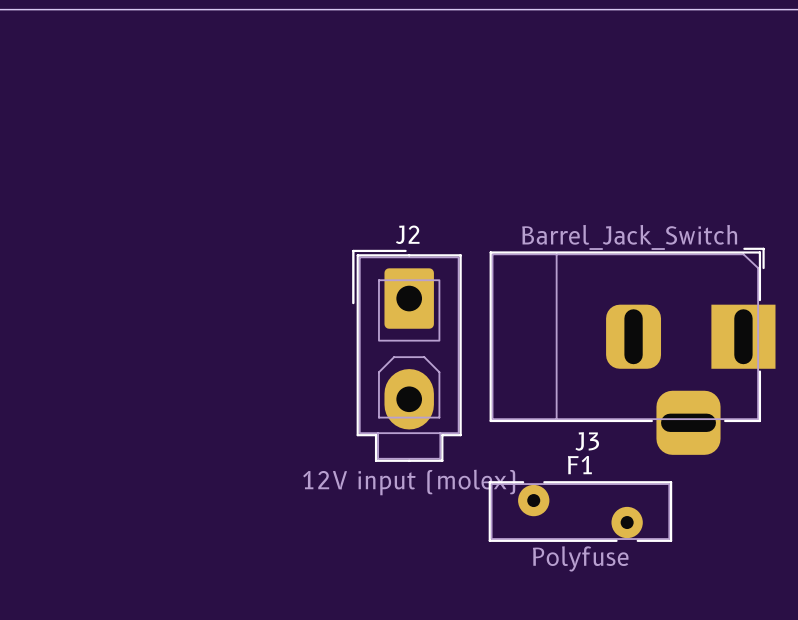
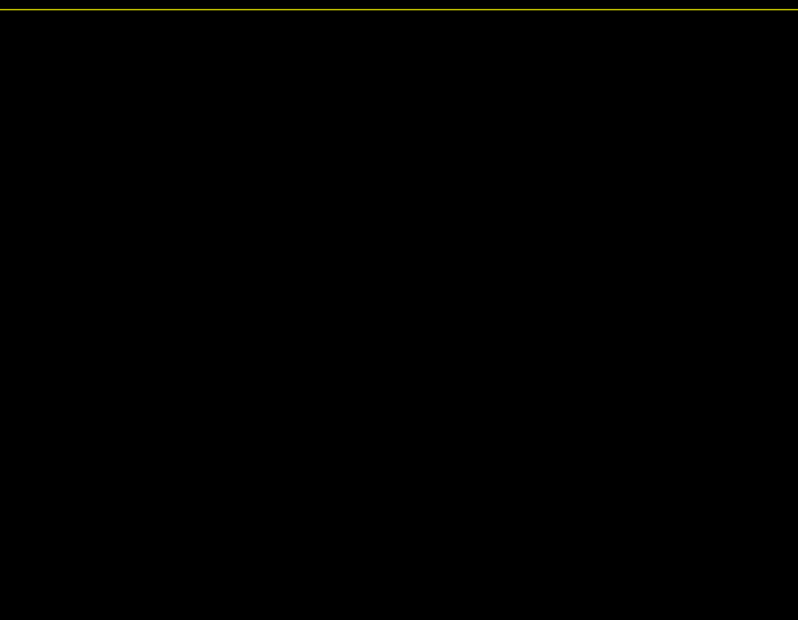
J3: Barrel_Jack_Switch (632, 351) -> none
J2: 12V input (molex) (407, 355) -> none
F1: Polyfuse (580, 511) -> none

